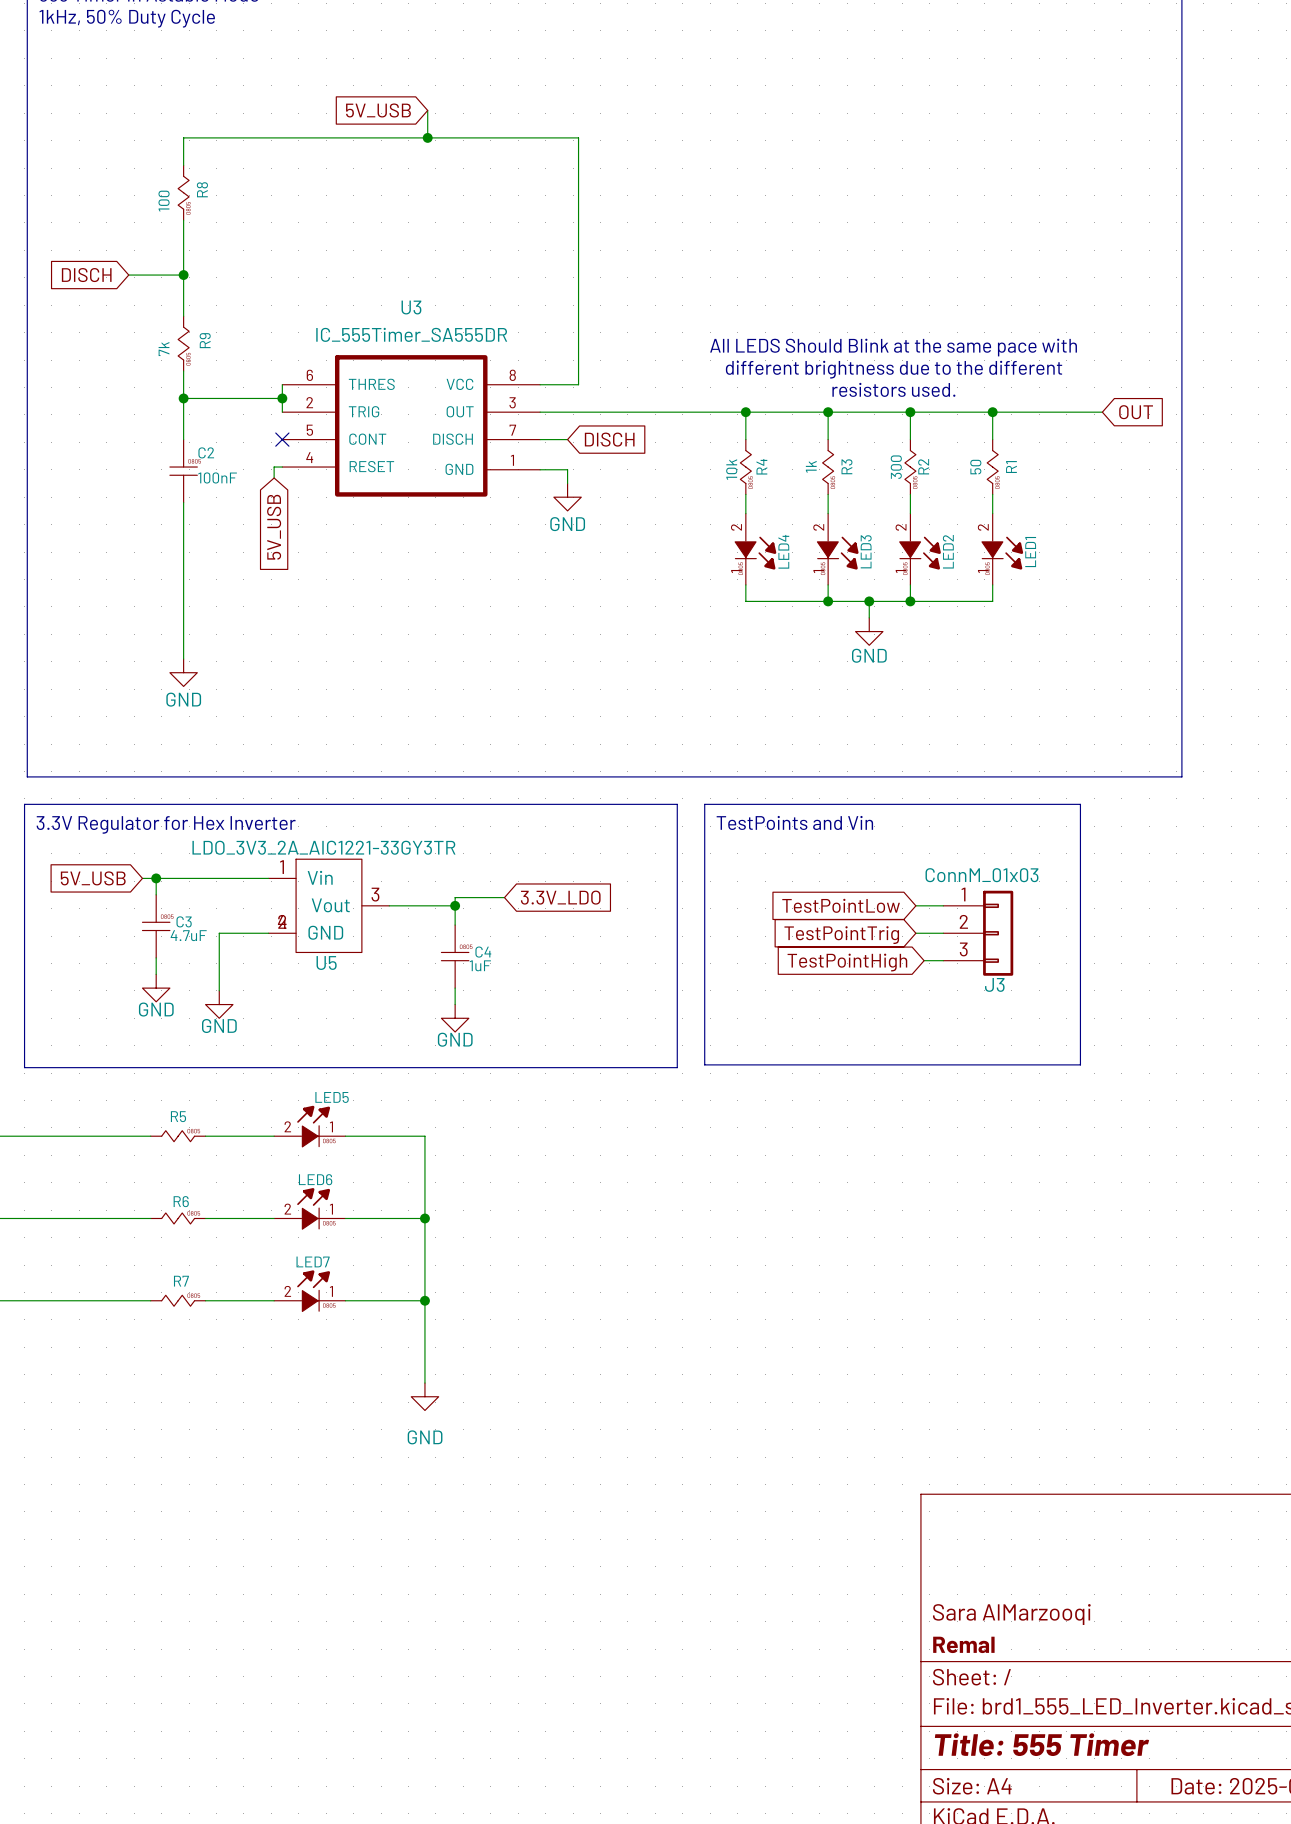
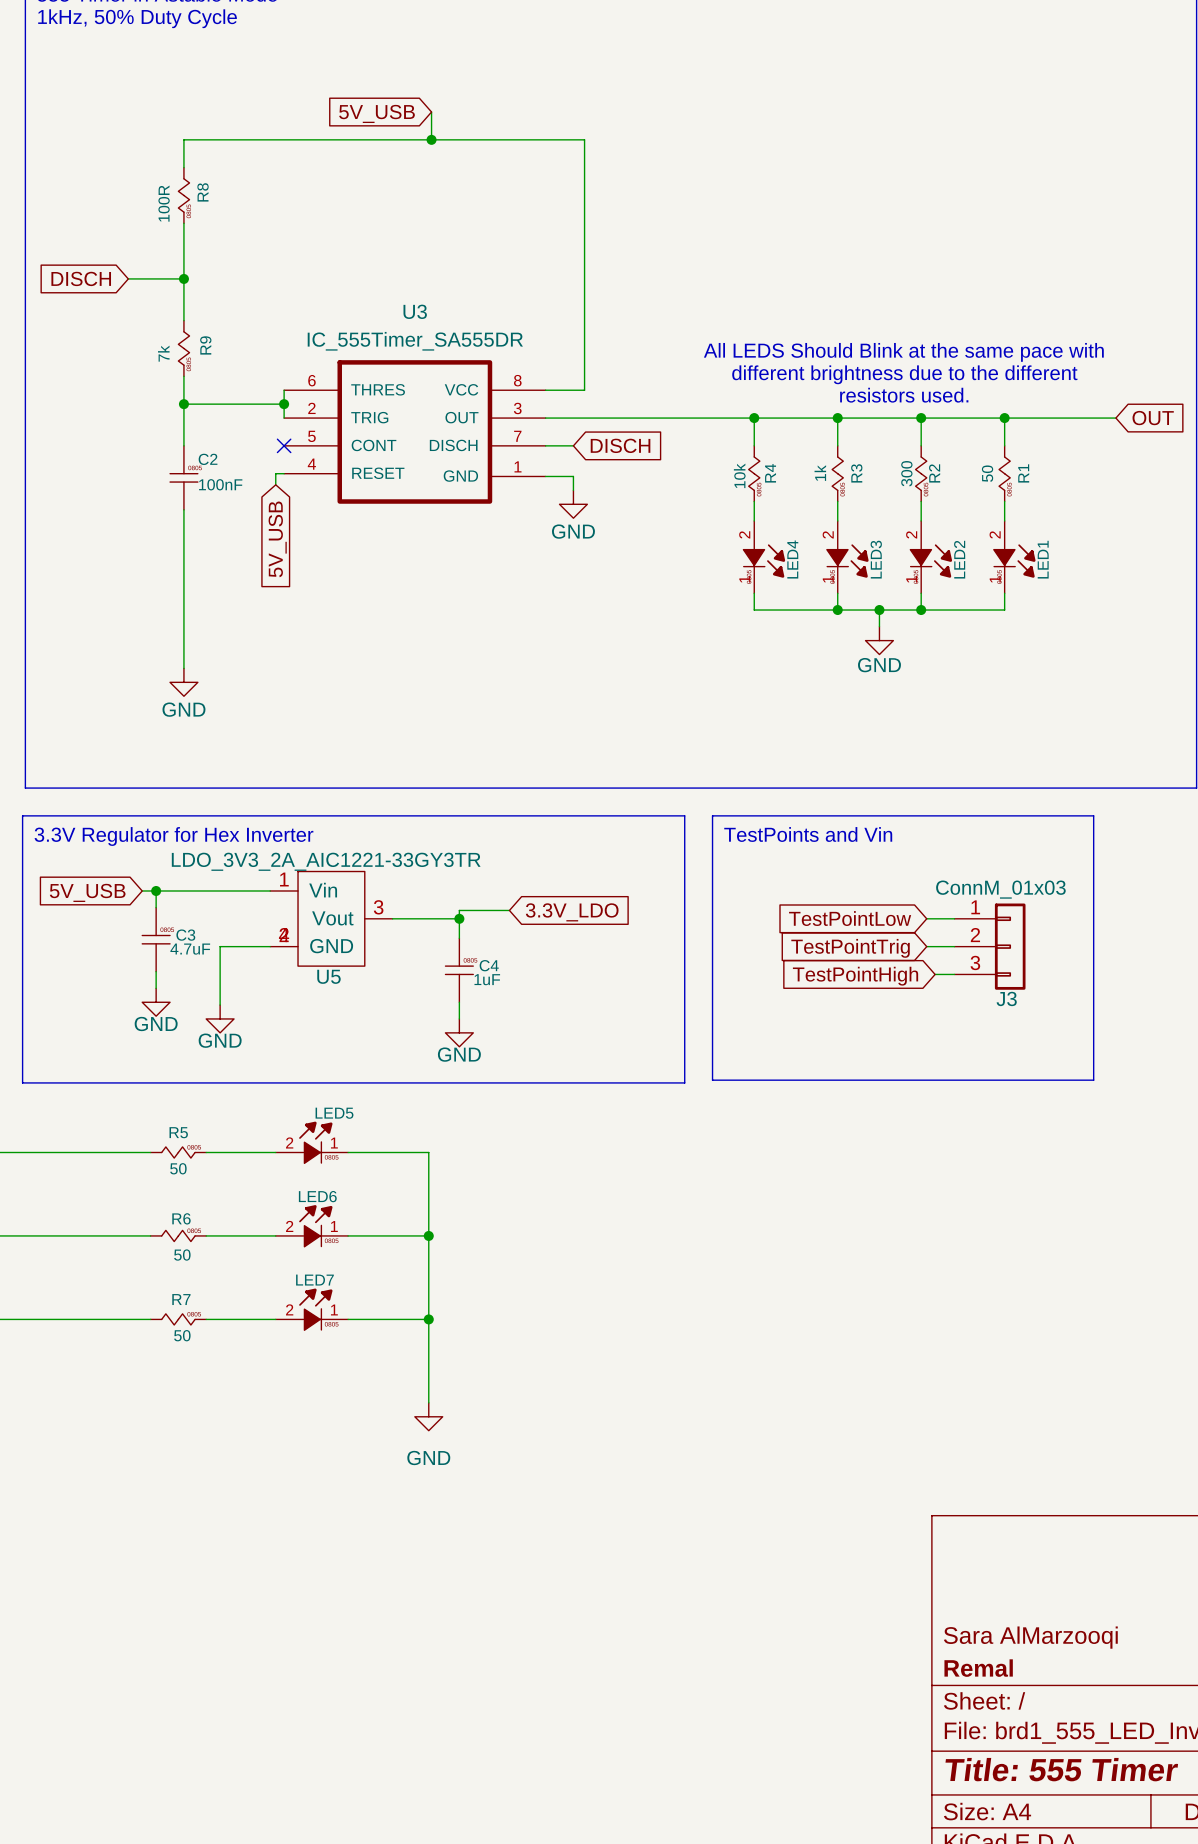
R8 value: 100 (164, 201) -> 100R (164, 203)
R5 value: none -> 50 (178, 1168)
R6 value: none -> 50 (182, 1255)
R7 value: none -> 50 (182, 1335)

